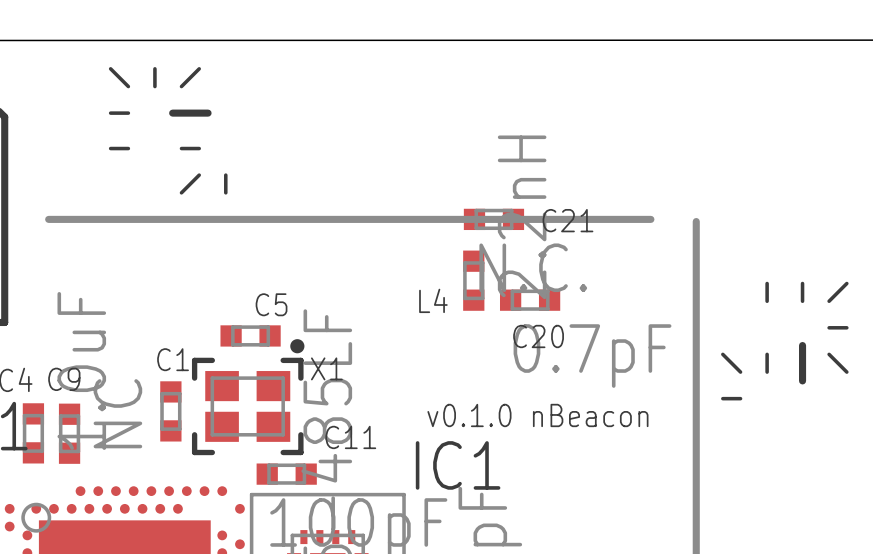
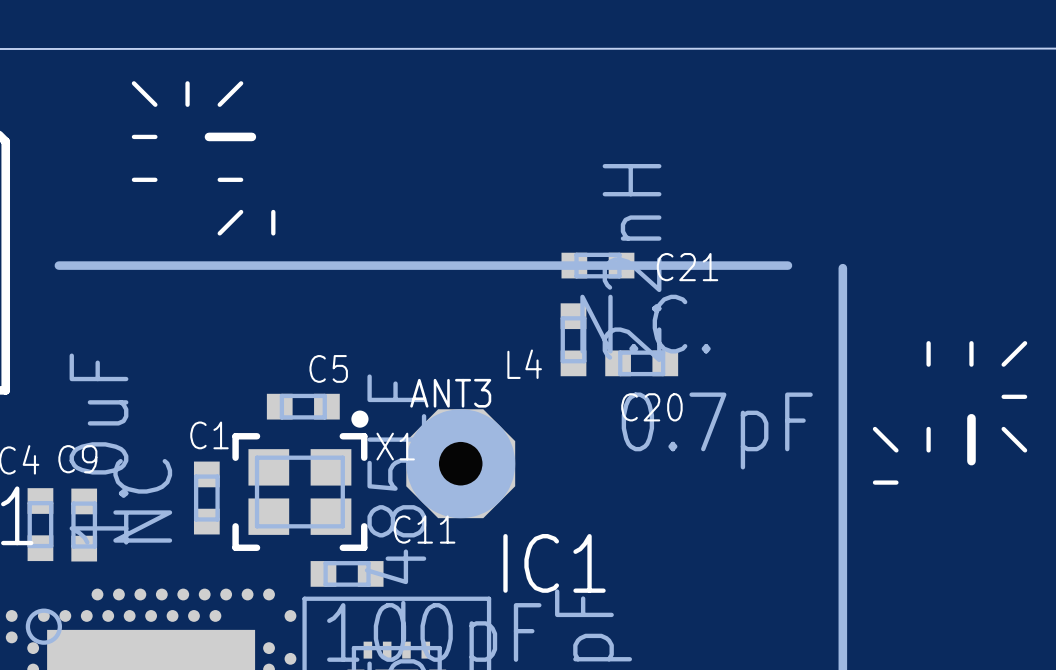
ANT3: none -> (460, 463)
text: v0.1.0 nBeacon (537, 415) -> none

